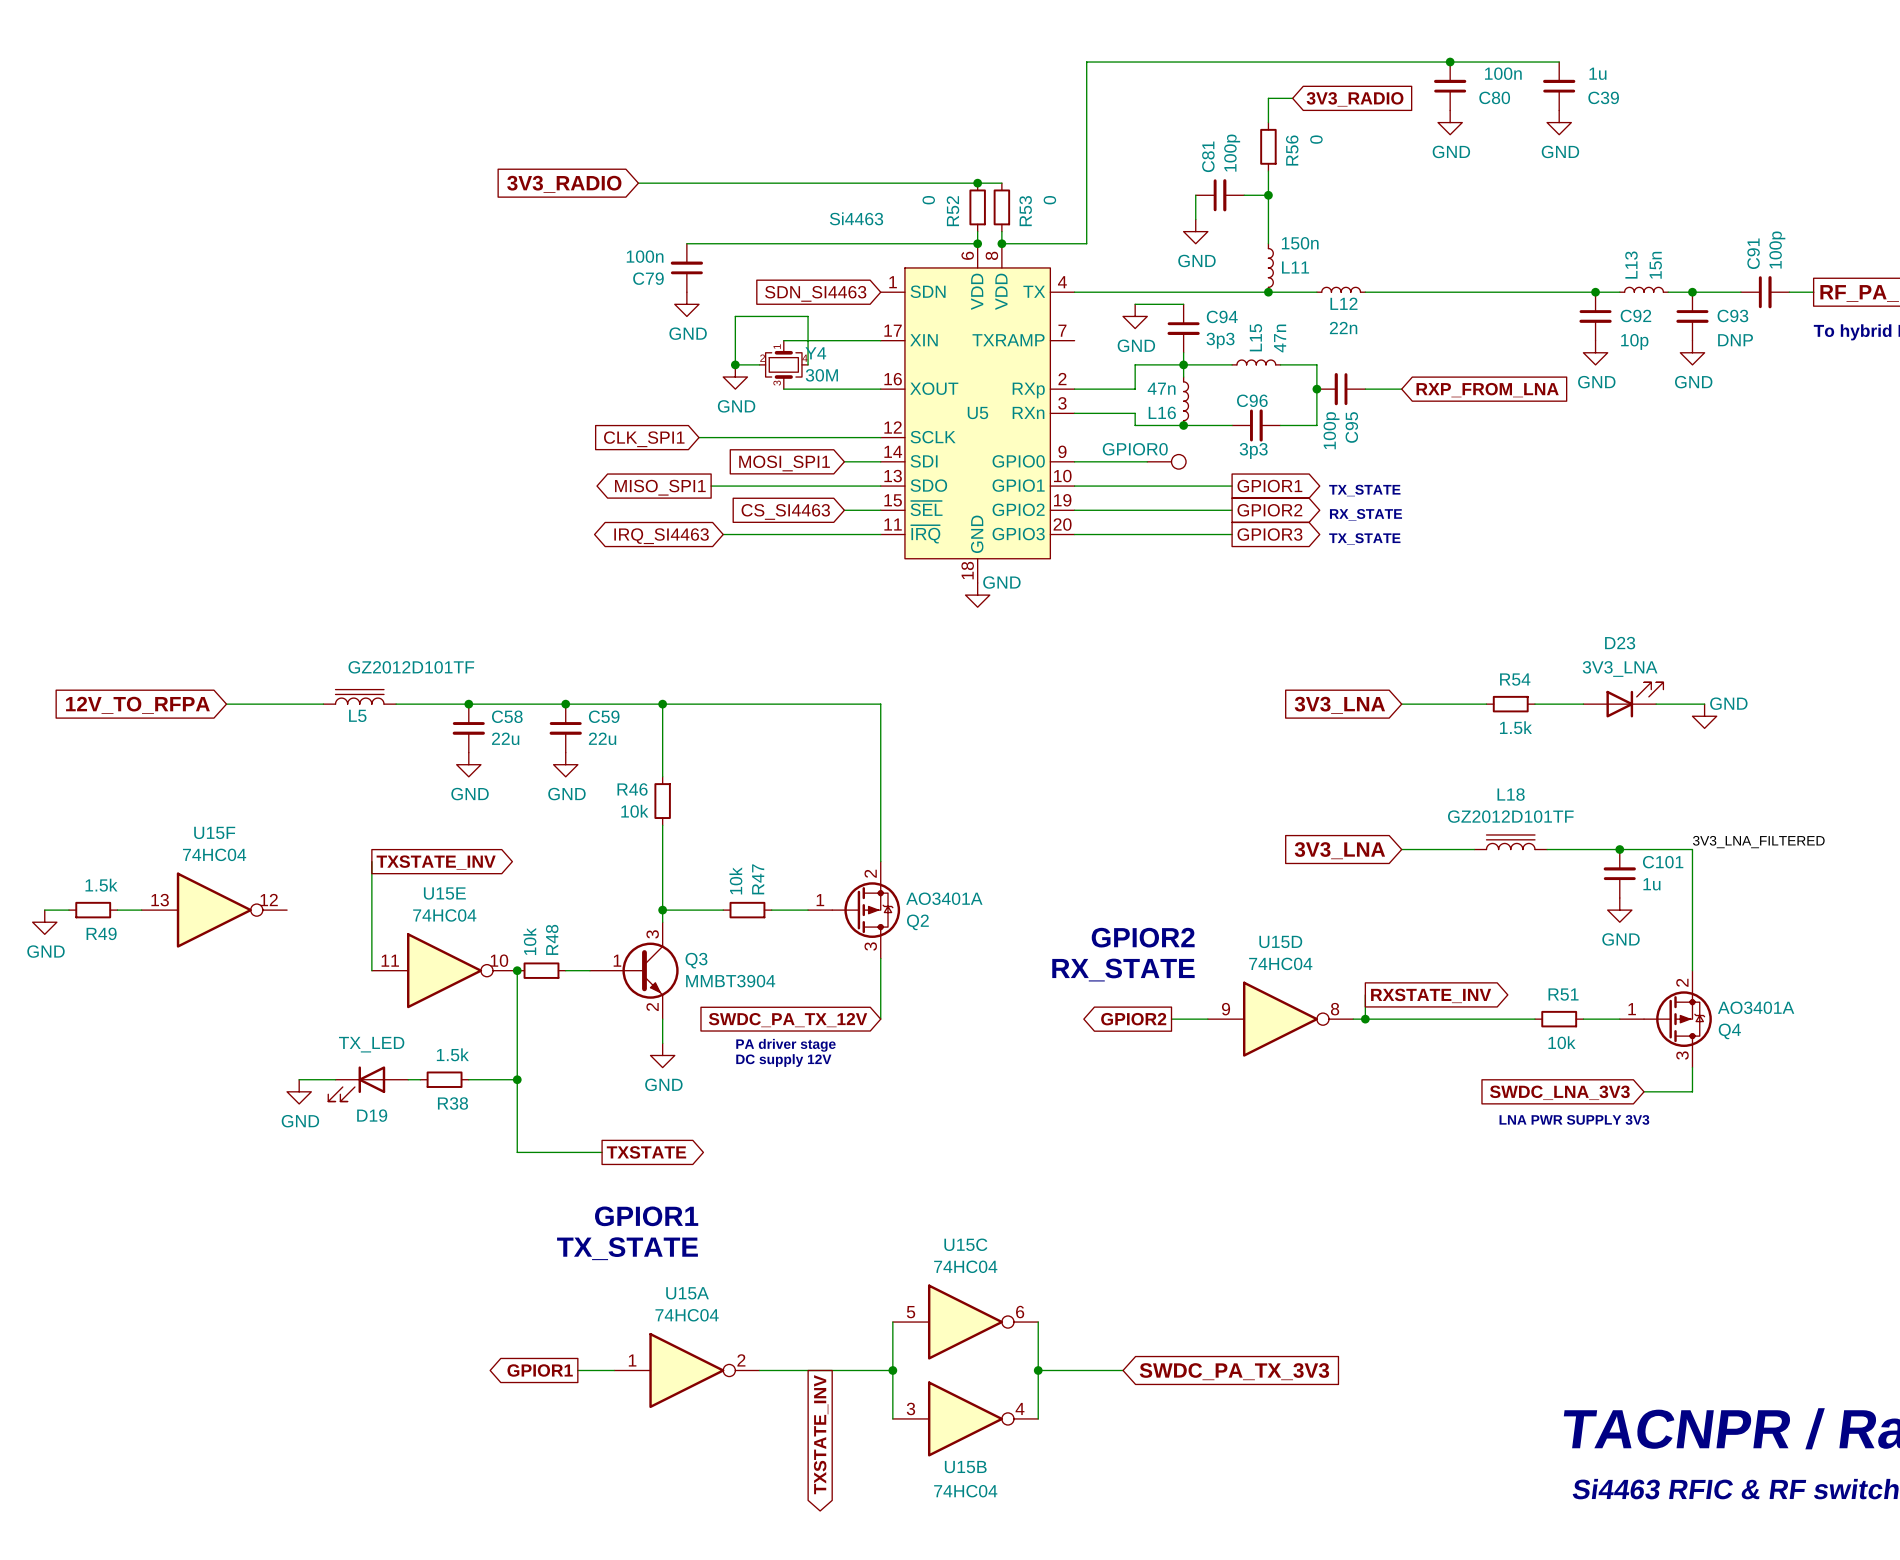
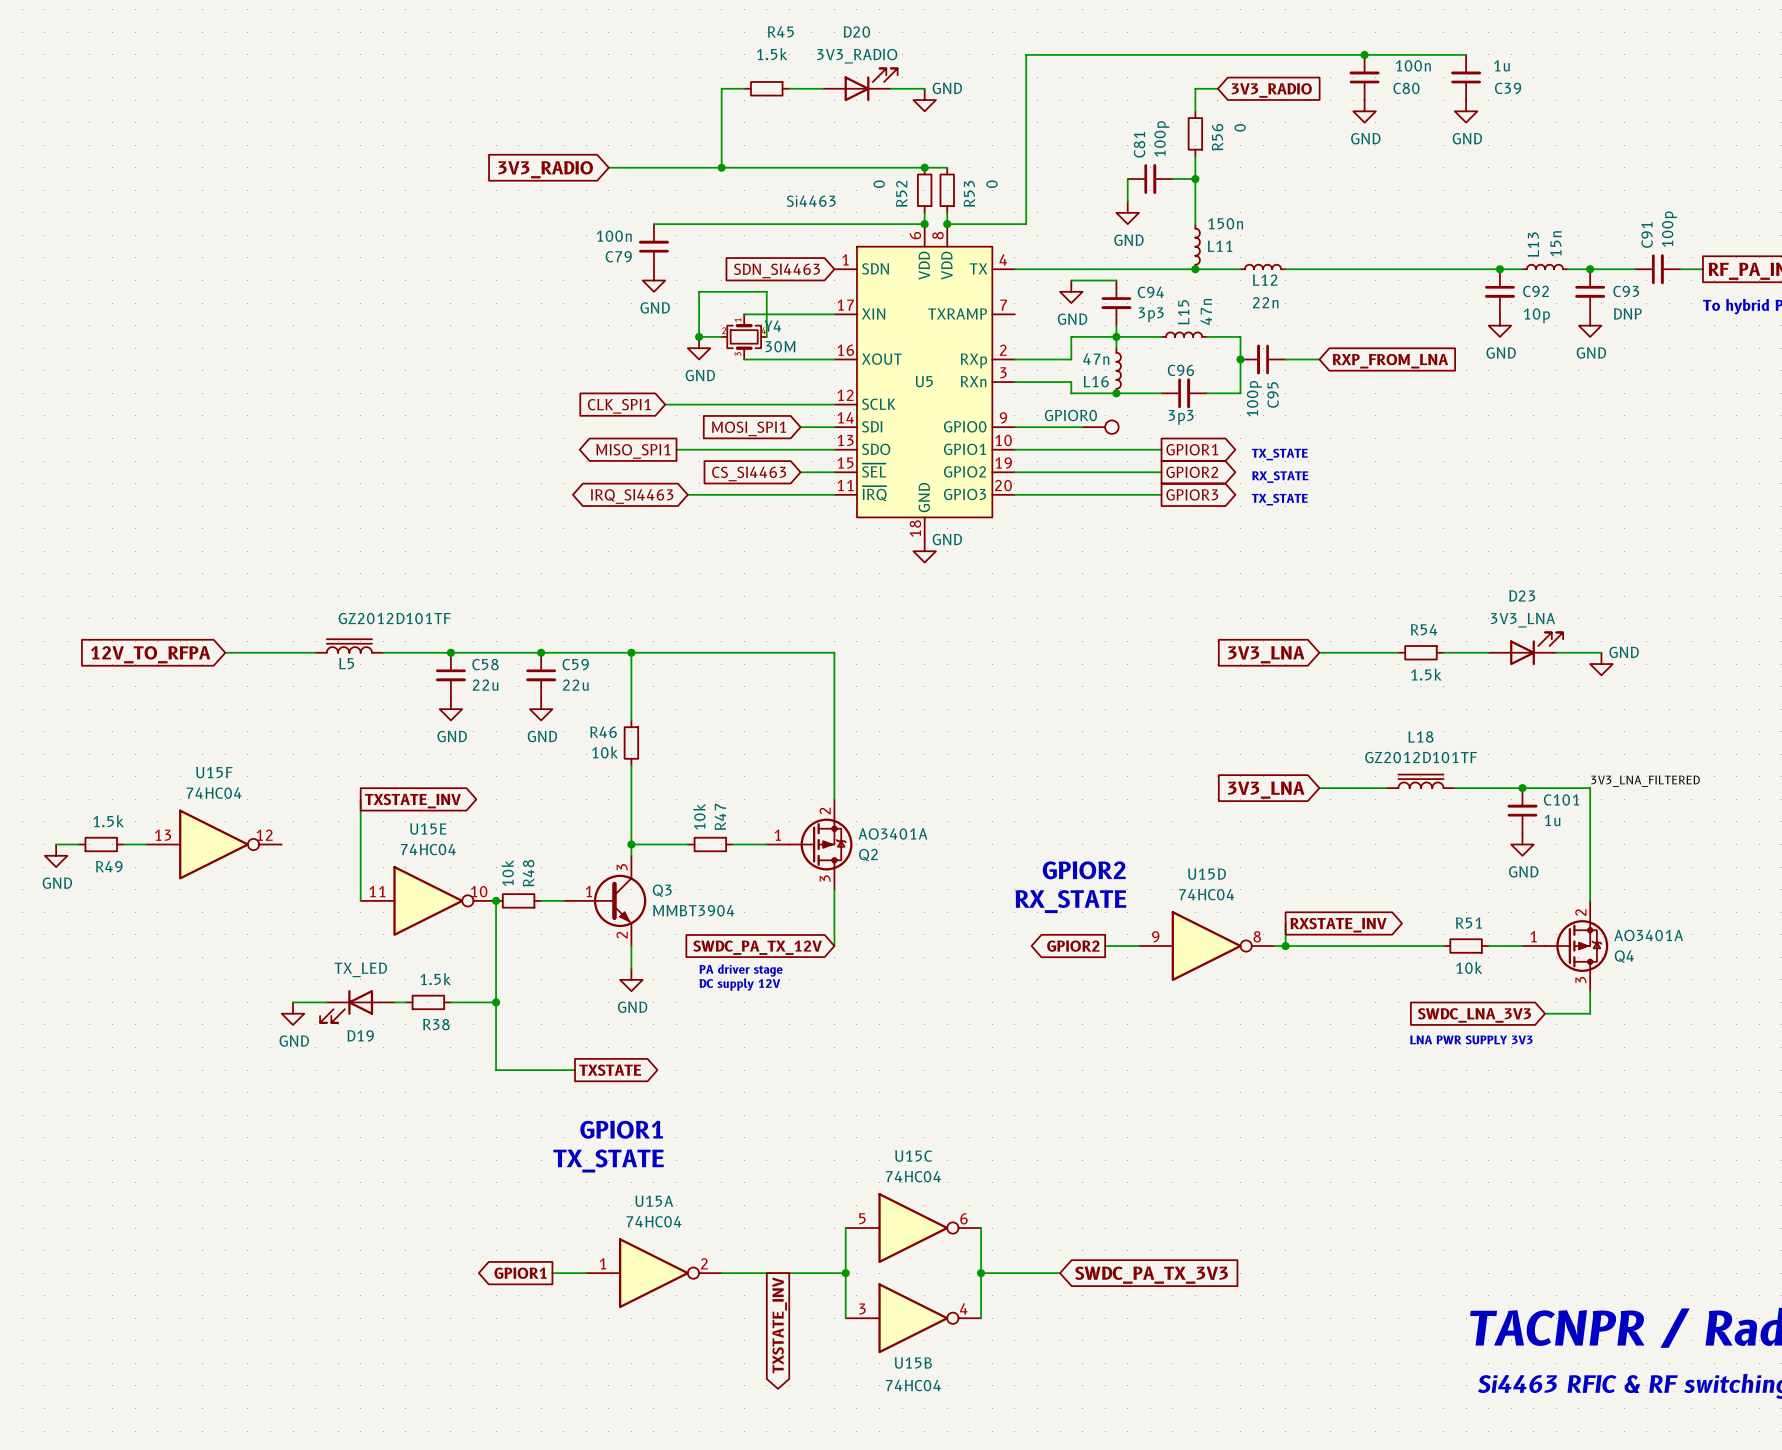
D20: none -> 3V3_RADIO (860, 84)
wire: none -> (744, 88) (721, 88) (721, 167)
R45: none -> 1.5k (766, 88)
wire: none -> (789, 88) (823, 88)
wire: none -> (890, 88) (924, 88)
power symbol: none -> GND (924, 100)
junction: none -> (721, 167)

